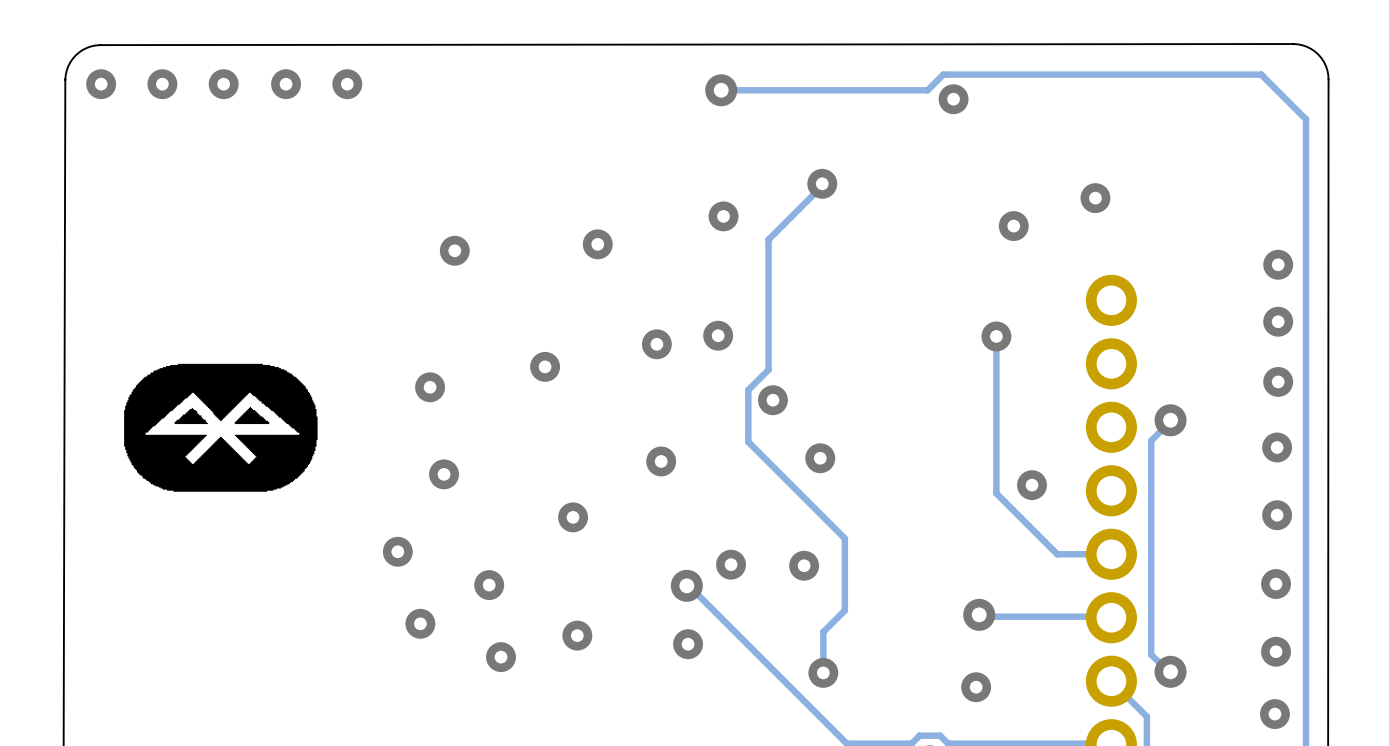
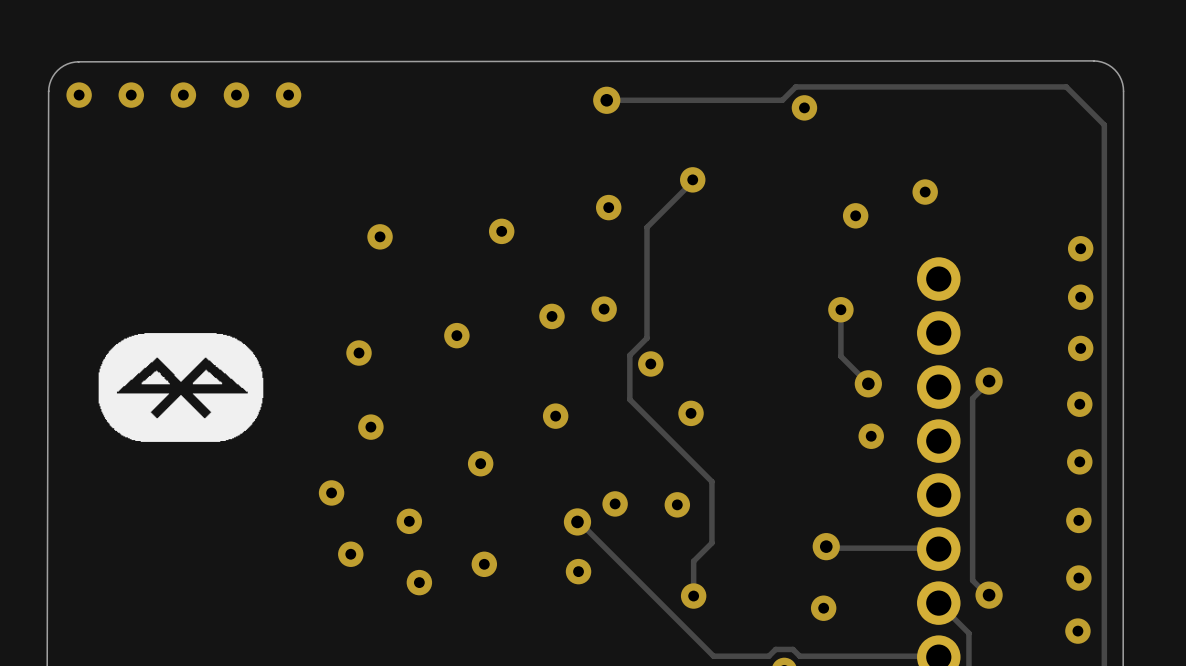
track: (996, 391) (996, 493) (1057, 554) (1111, 554) -> (840, 356) (868, 383)
via: none -> (868, 383)

